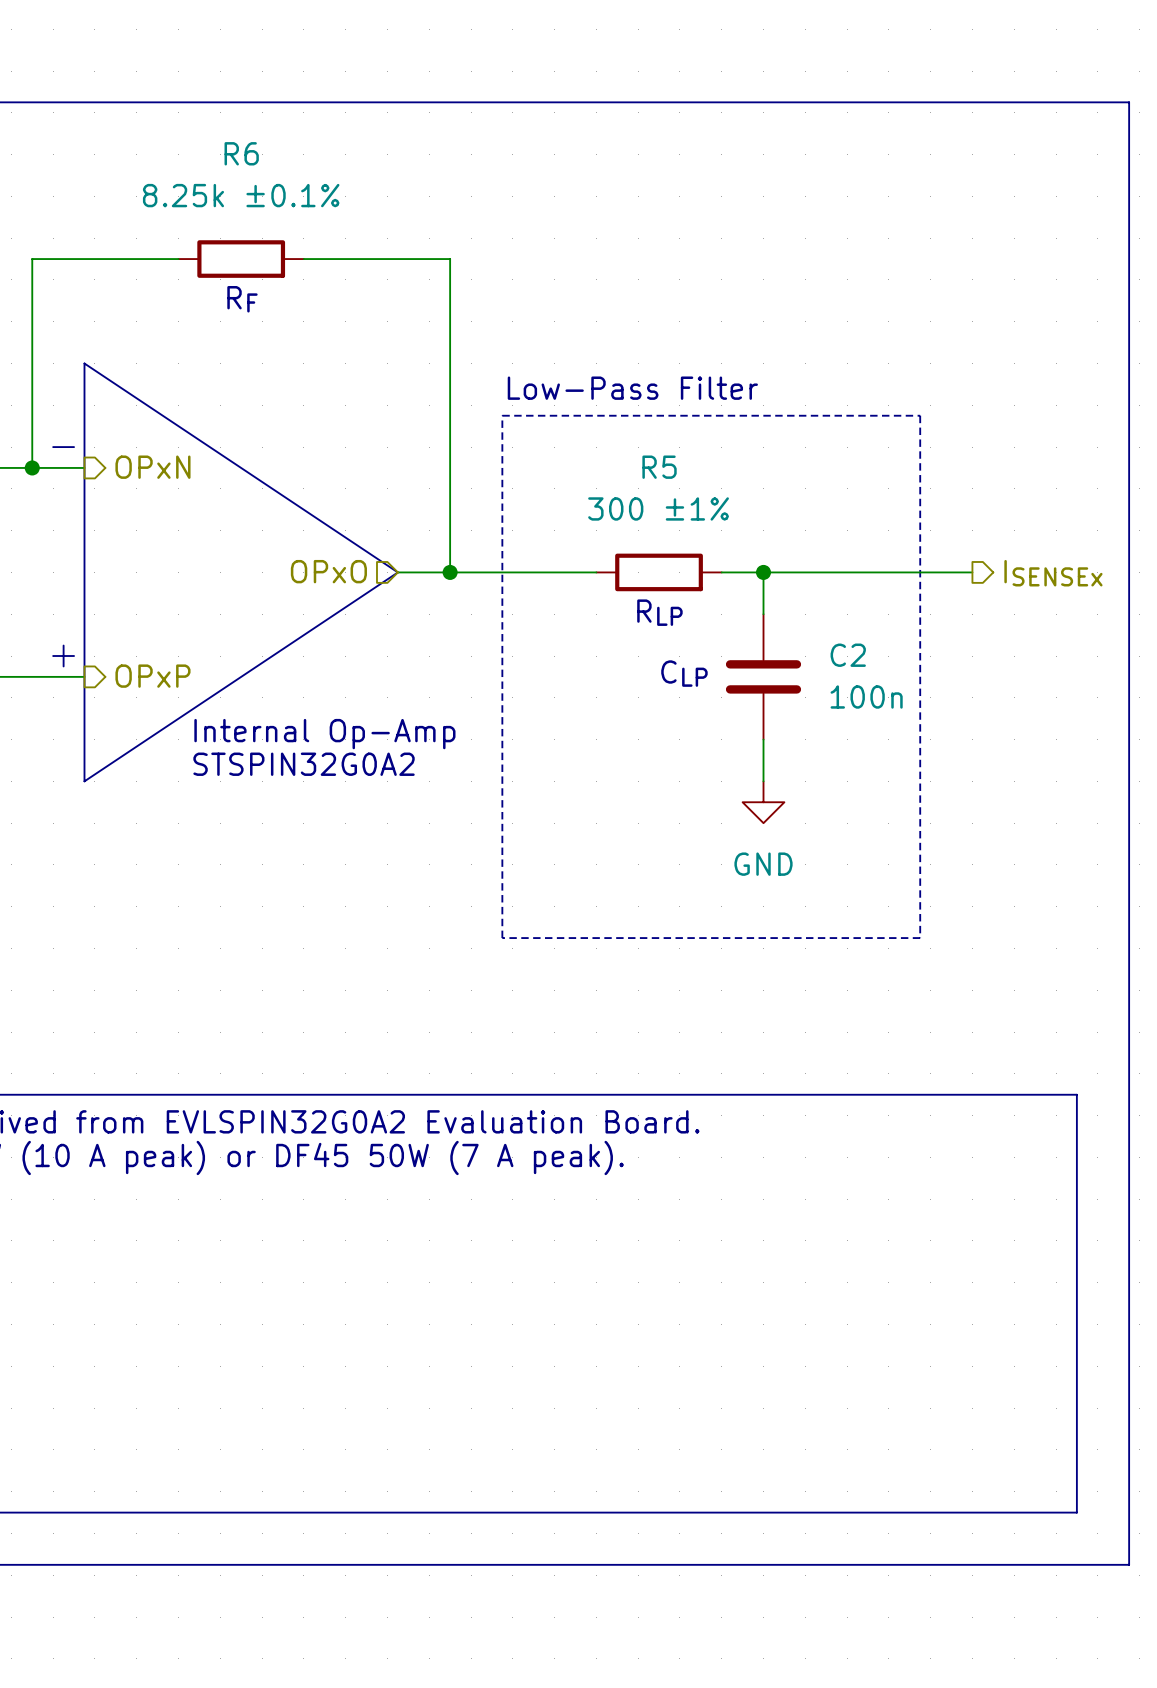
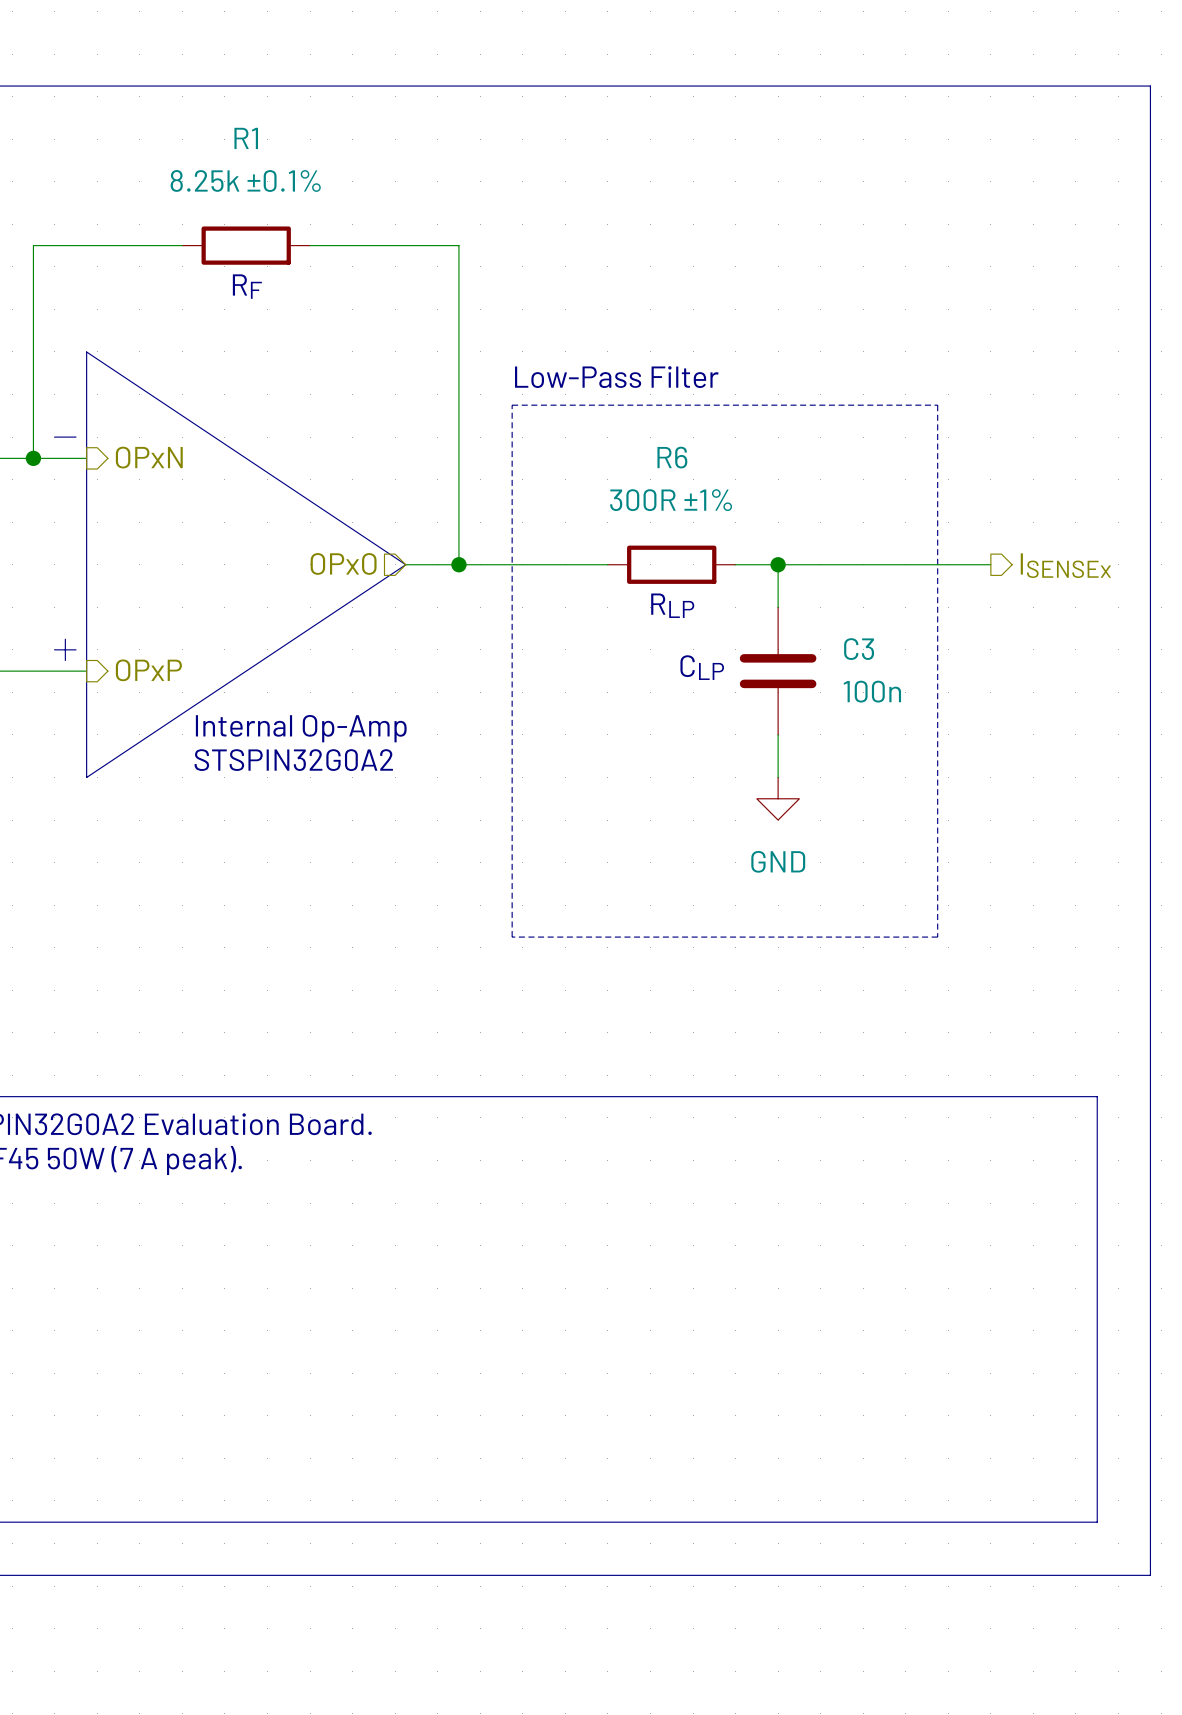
R6 name: R6 (241, 153) -> R1 (246, 138)
R5 name: R5 (659, 467) -> R6 (672, 457)
R5 value: 300 ±1% (658, 508) -> 300R ±1% (671, 500)
C2 name: C2 (848, 655) -> C3 (859, 649)

